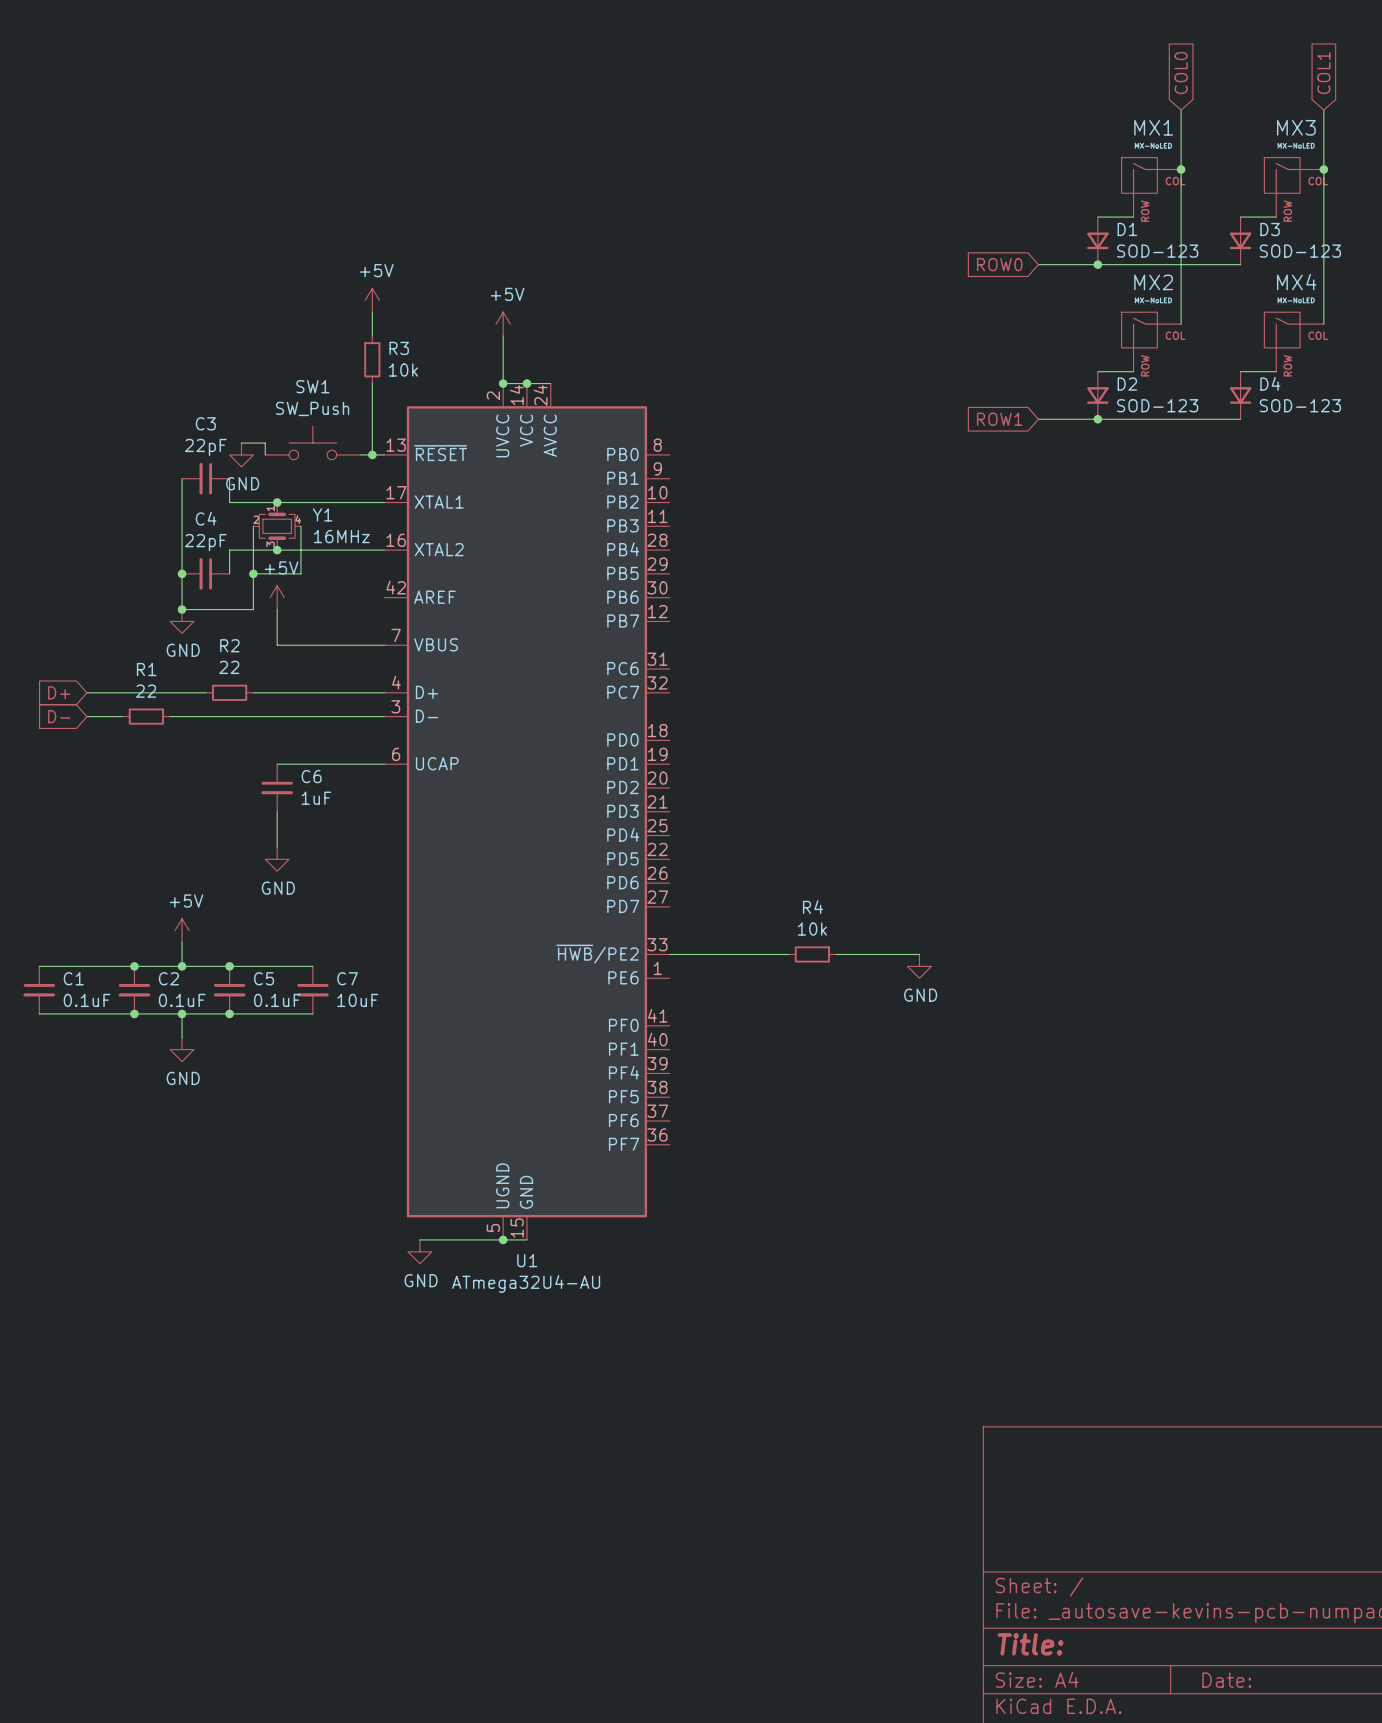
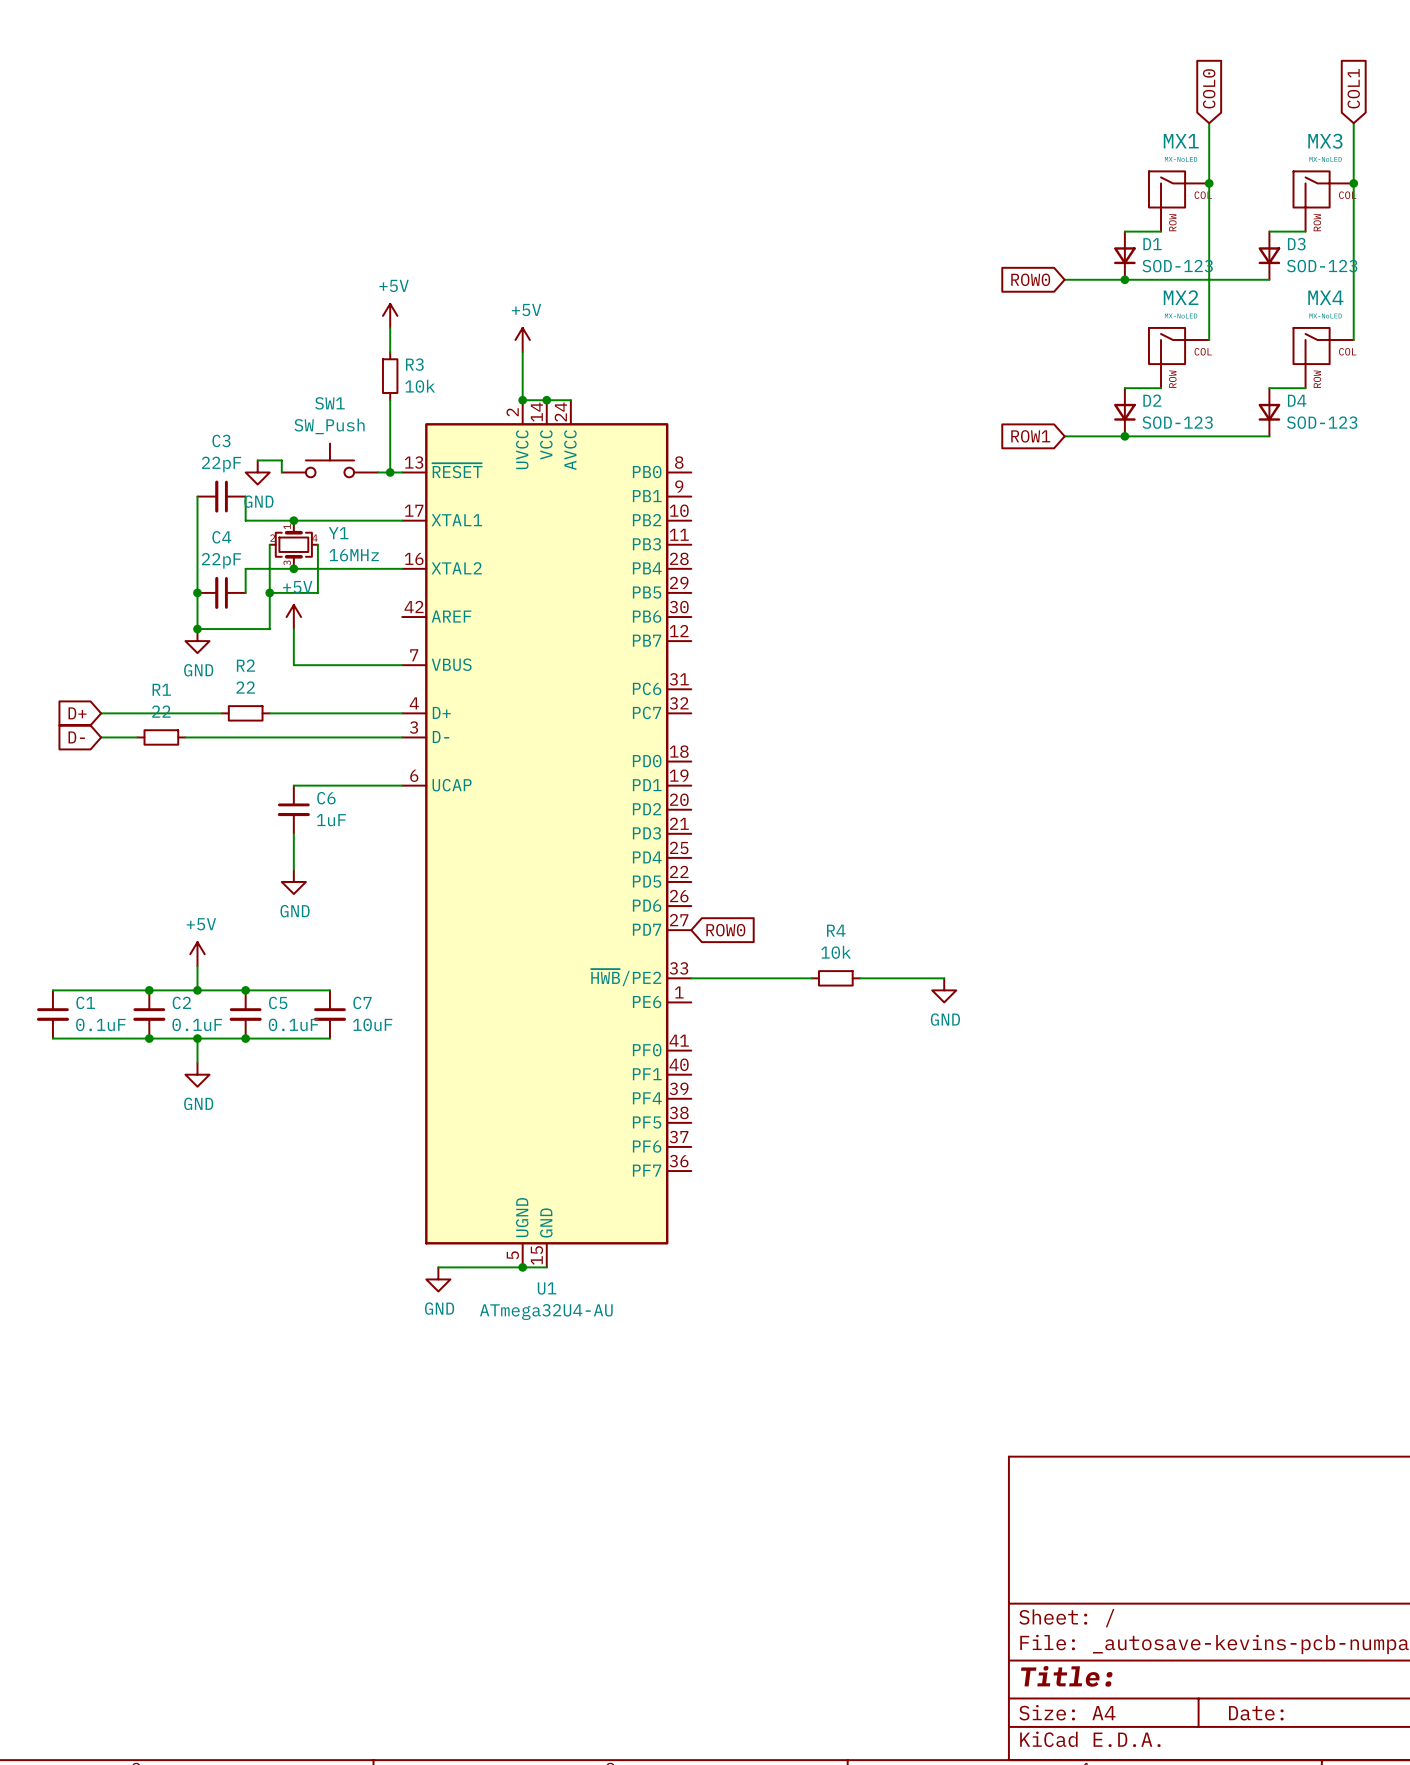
global label: none -> ROW0 (725, 930)

